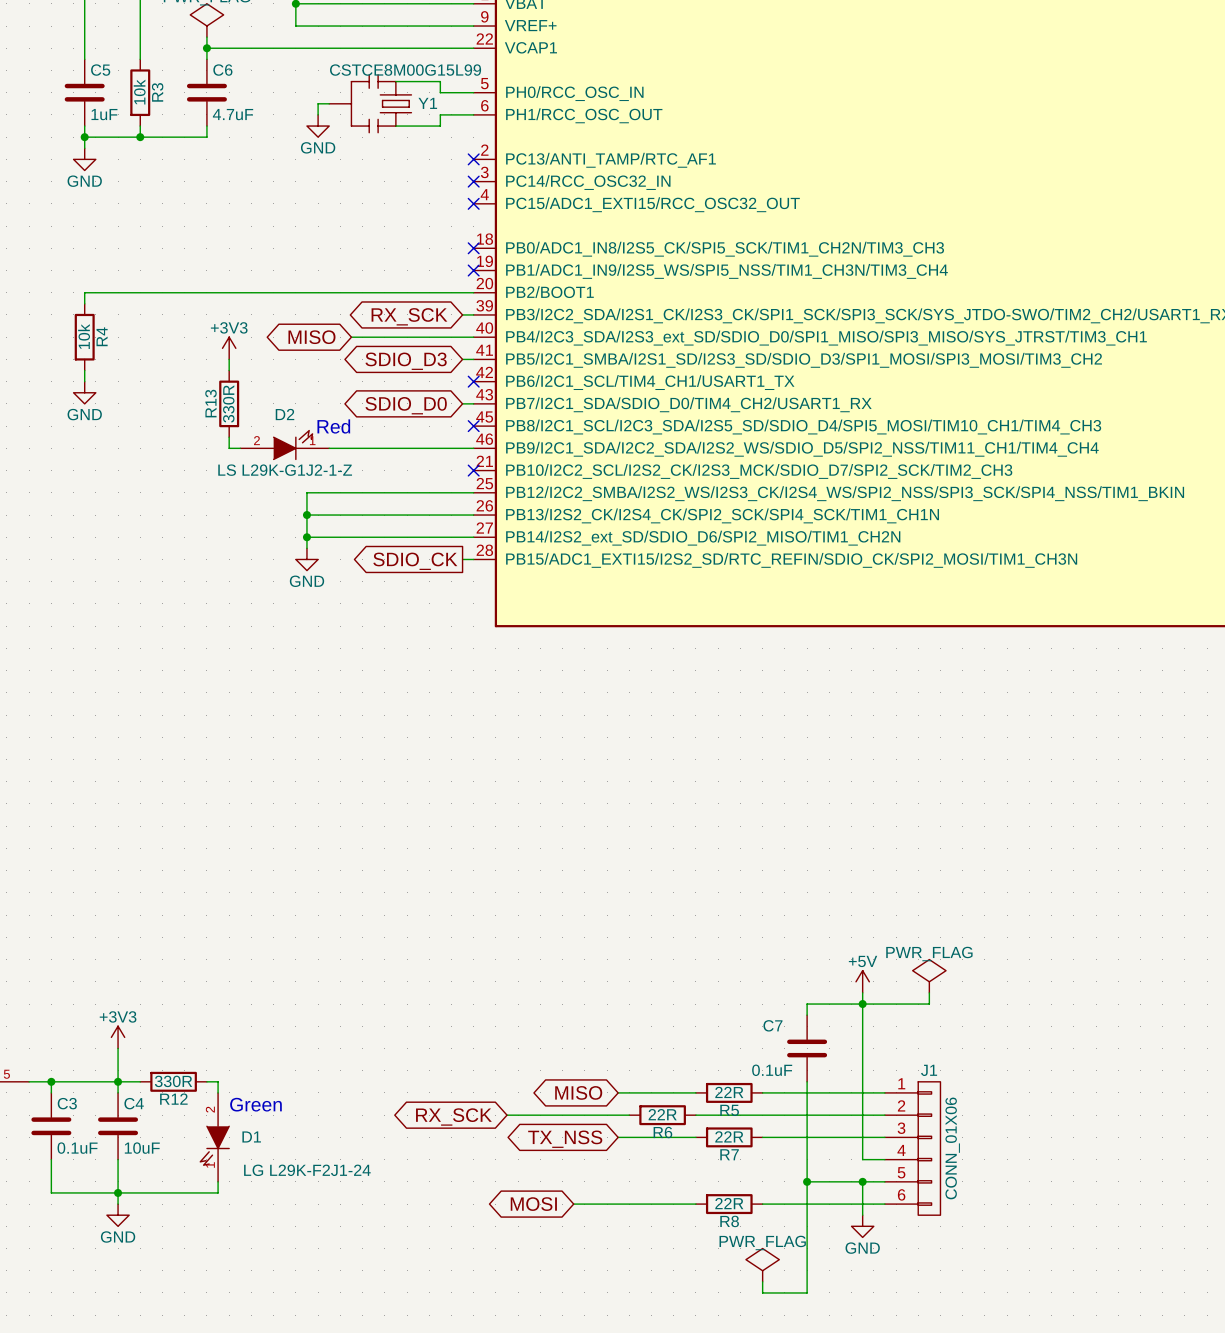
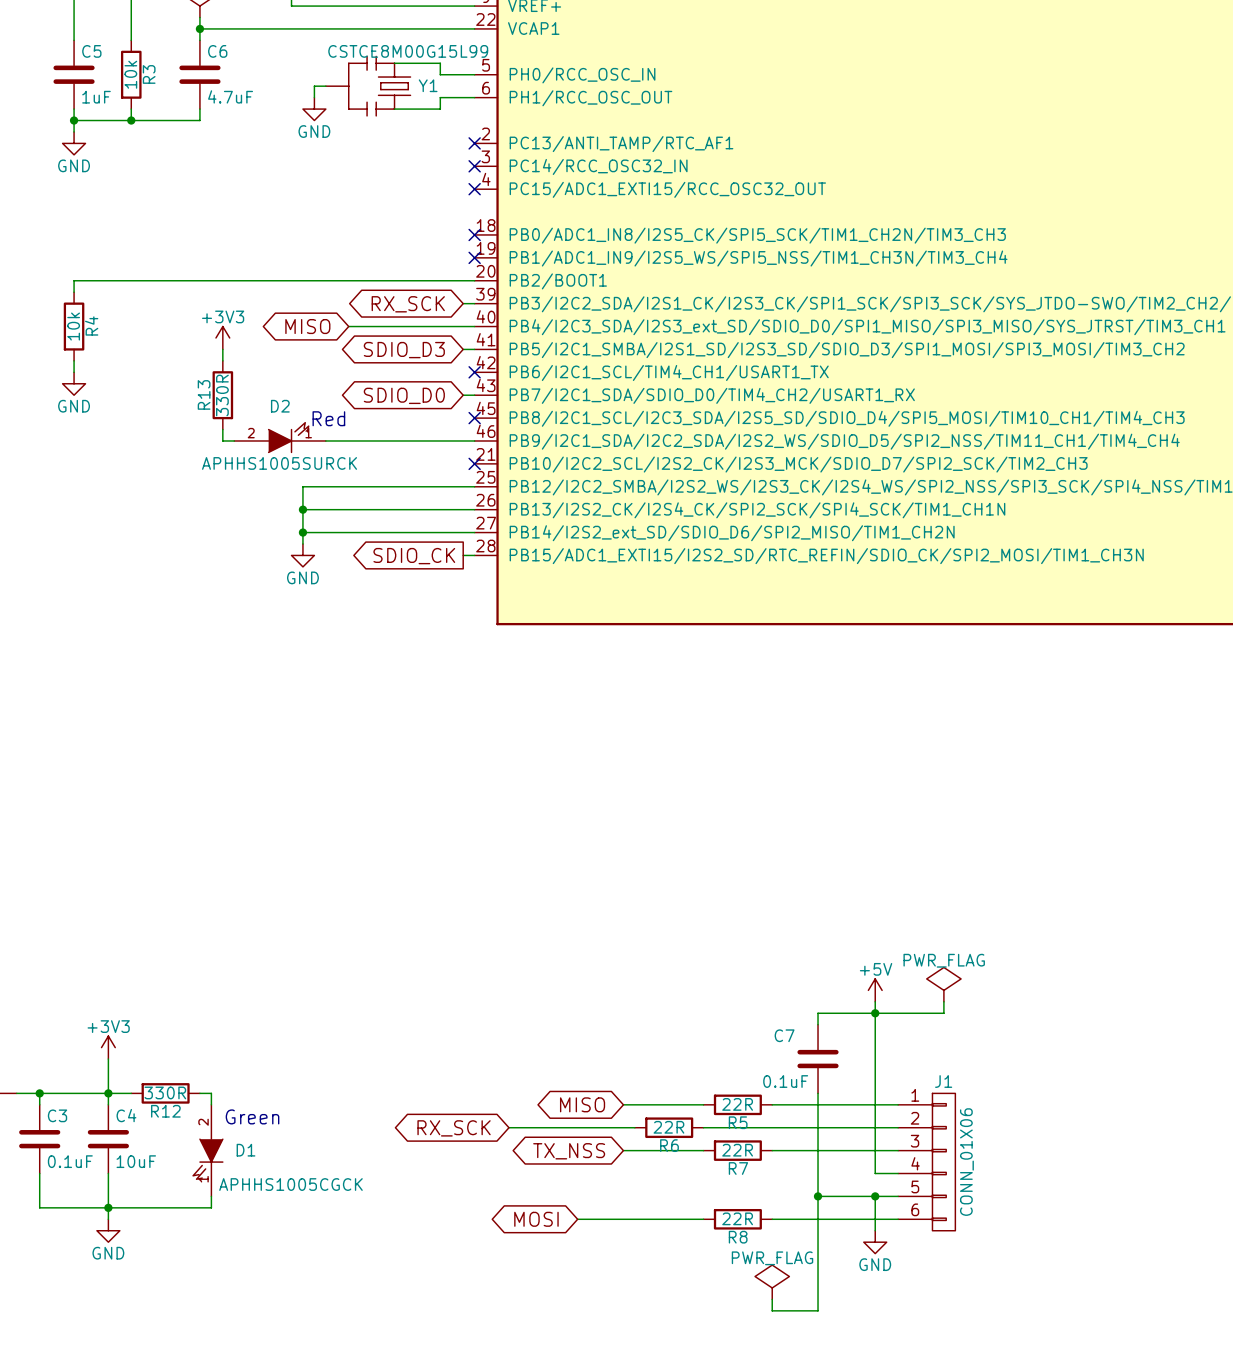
D2 value: LS L29K-G1J2-1-Z (285, 470) -> APHHS1005SURCK (279, 463)
D1 value: LG L29K-F2J1-24 (307, 1170) -> APHHS1005CGCK (290, 1184)

